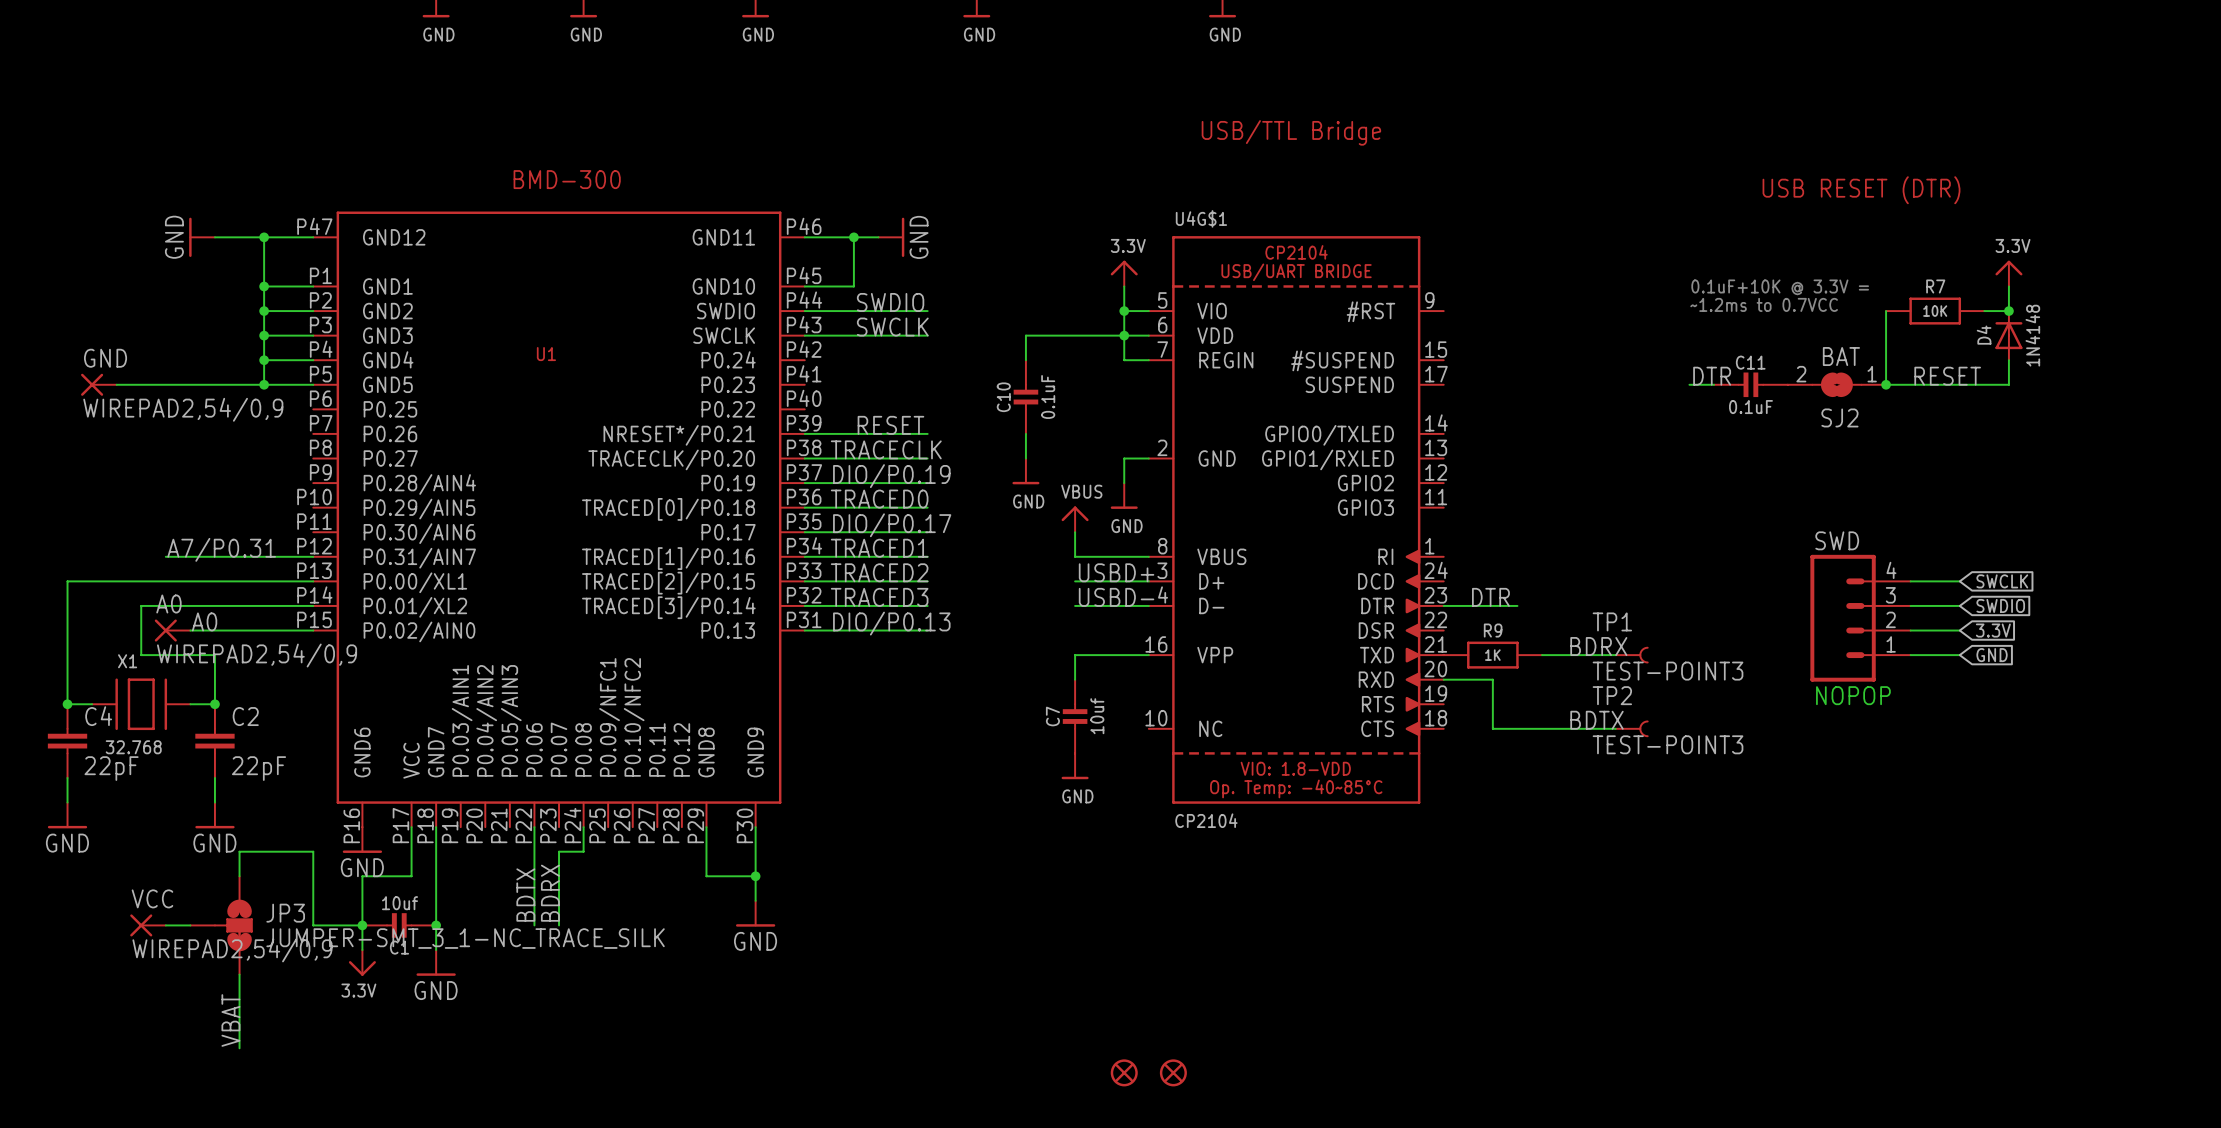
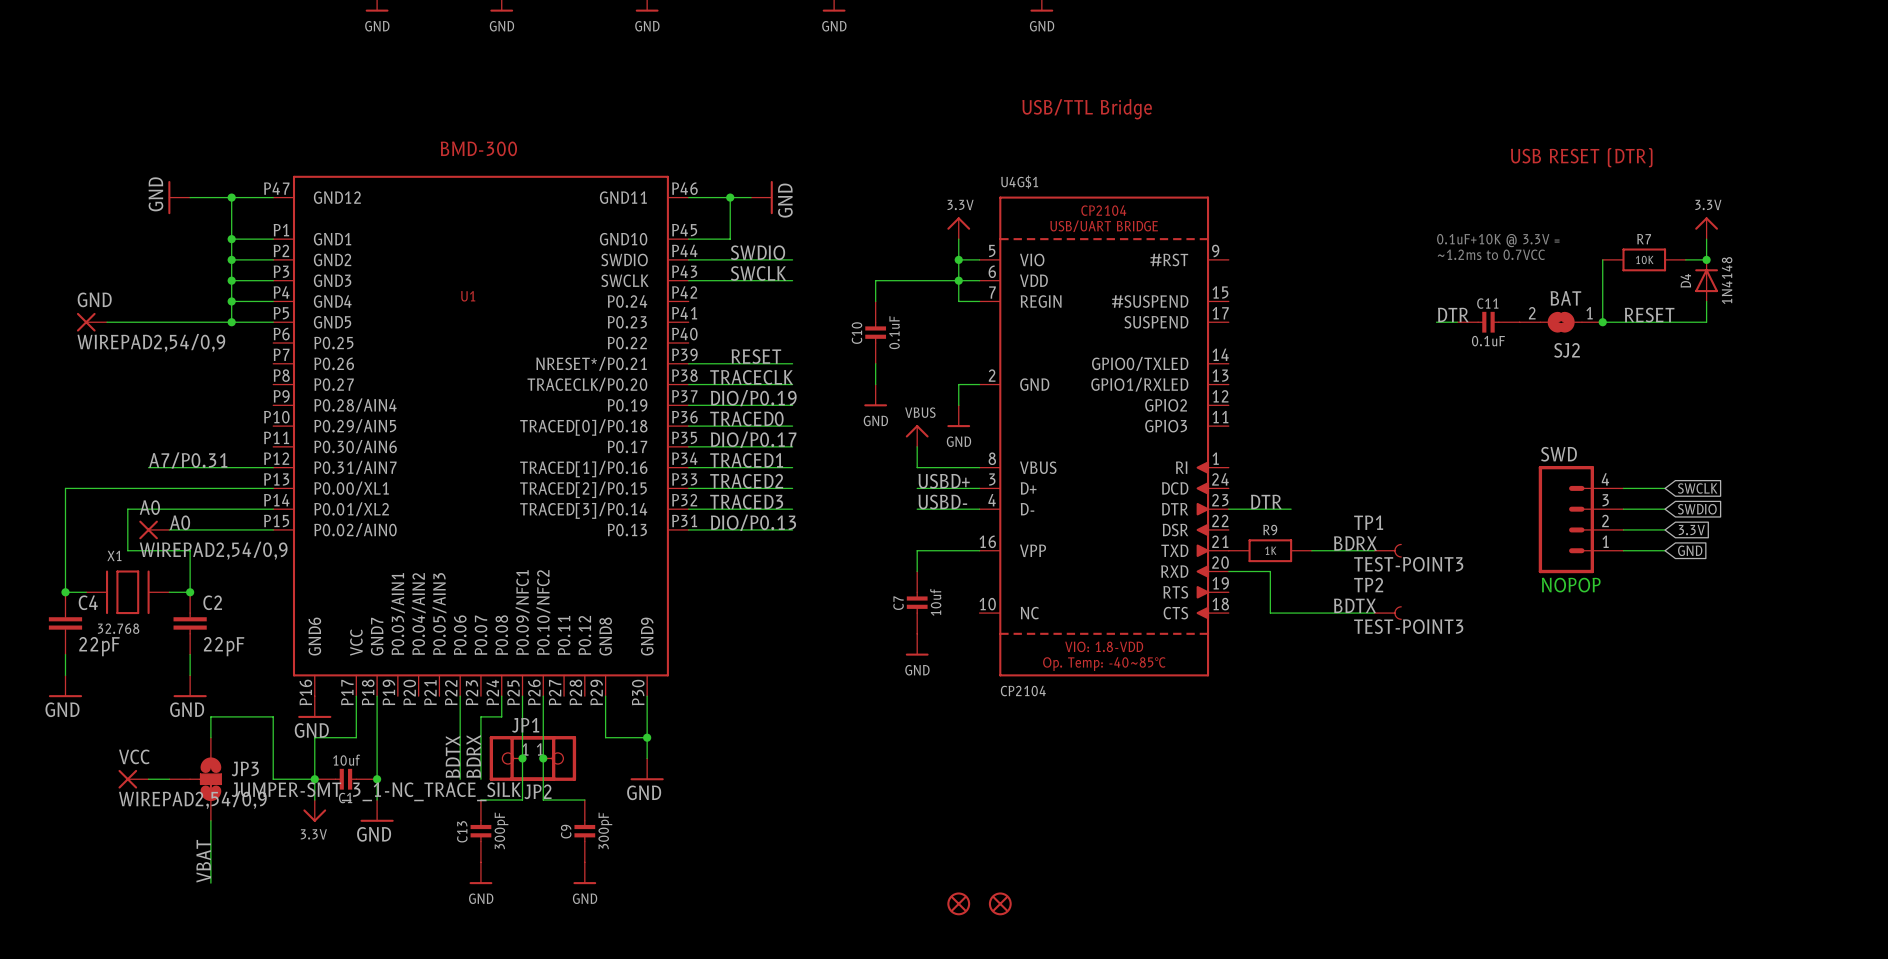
wire: none -> (522, 696) (522, 800) (480, 800)
wire: none -> (543, 696) (543, 800) (584, 800)
JP2: none -> (522, 758)
junction: none -> (522, 758)
JP1: none -> (543, 758)
junction: none -> (543, 758)
C13: none -> 300pF (480, 831)
C9: none -> 300pF (584, 831)
power symbol: none -> GND (480, 873)
power symbol: none -> GND (584, 873)

